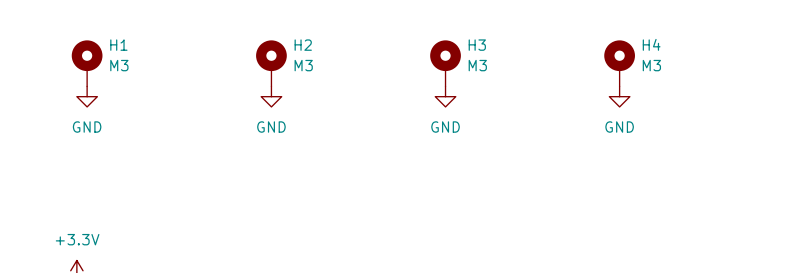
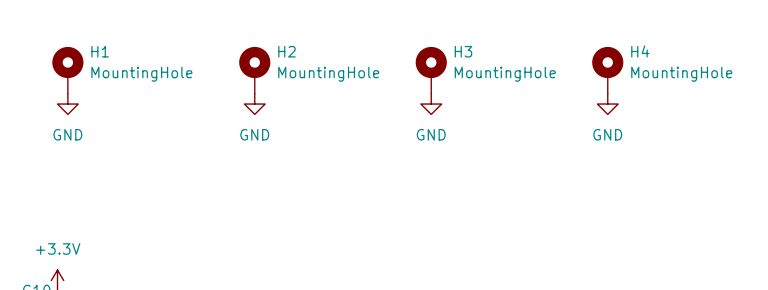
H1 value: M3 (119, 65) -> MountingHole (141, 74)
H2 value: M3 (303, 65) -> MountingHole (328, 74)
H3 value: M3 (477, 65) -> MountingHole (505, 74)
H4 value: M3 (651, 65) -> MountingHole (681, 74)

